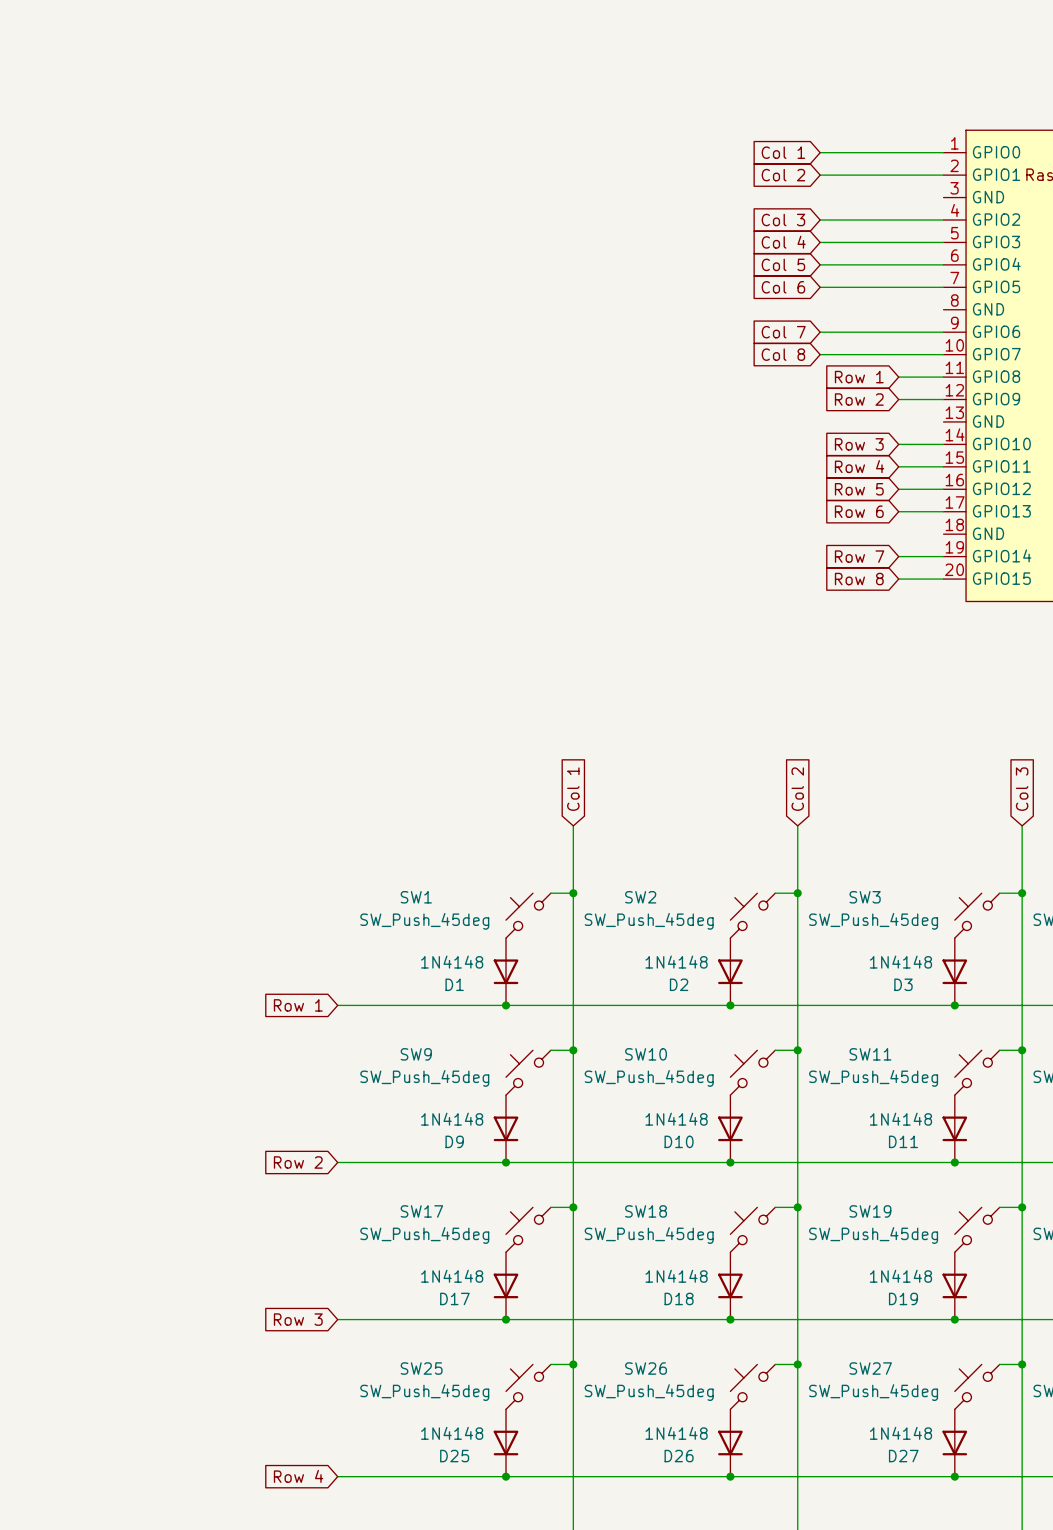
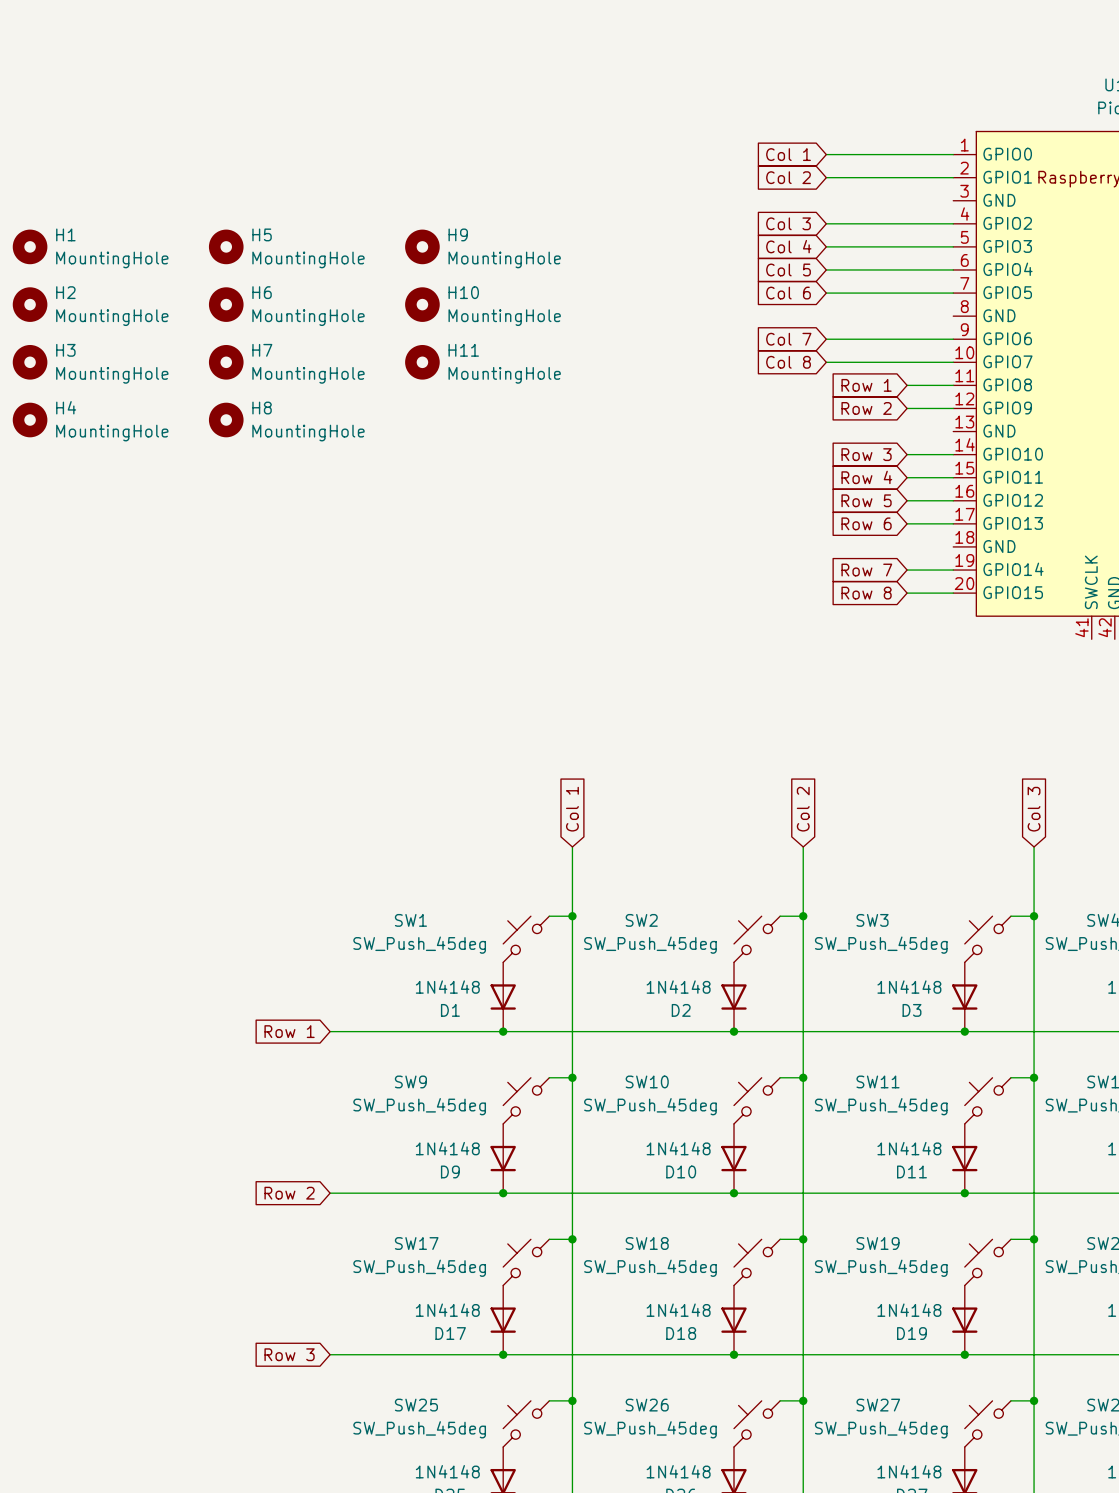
H1: none -> MountingHole (30, 246)
H5: none -> MountingHole (226, 246)
H9: none -> MountingHole (422, 246)
H2: none -> MountingHole (30, 304)
H6: none -> MountingHole (226, 304)
H10: none -> MountingHole (422, 304)
H3: none -> MountingHole (30, 362)
H7: none -> MountingHole (226, 362)
H11: none -> MountingHole (422, 362)
H4: none -> MountingHole (30, 420)
H8: none -> MountingHole (226, 420)

